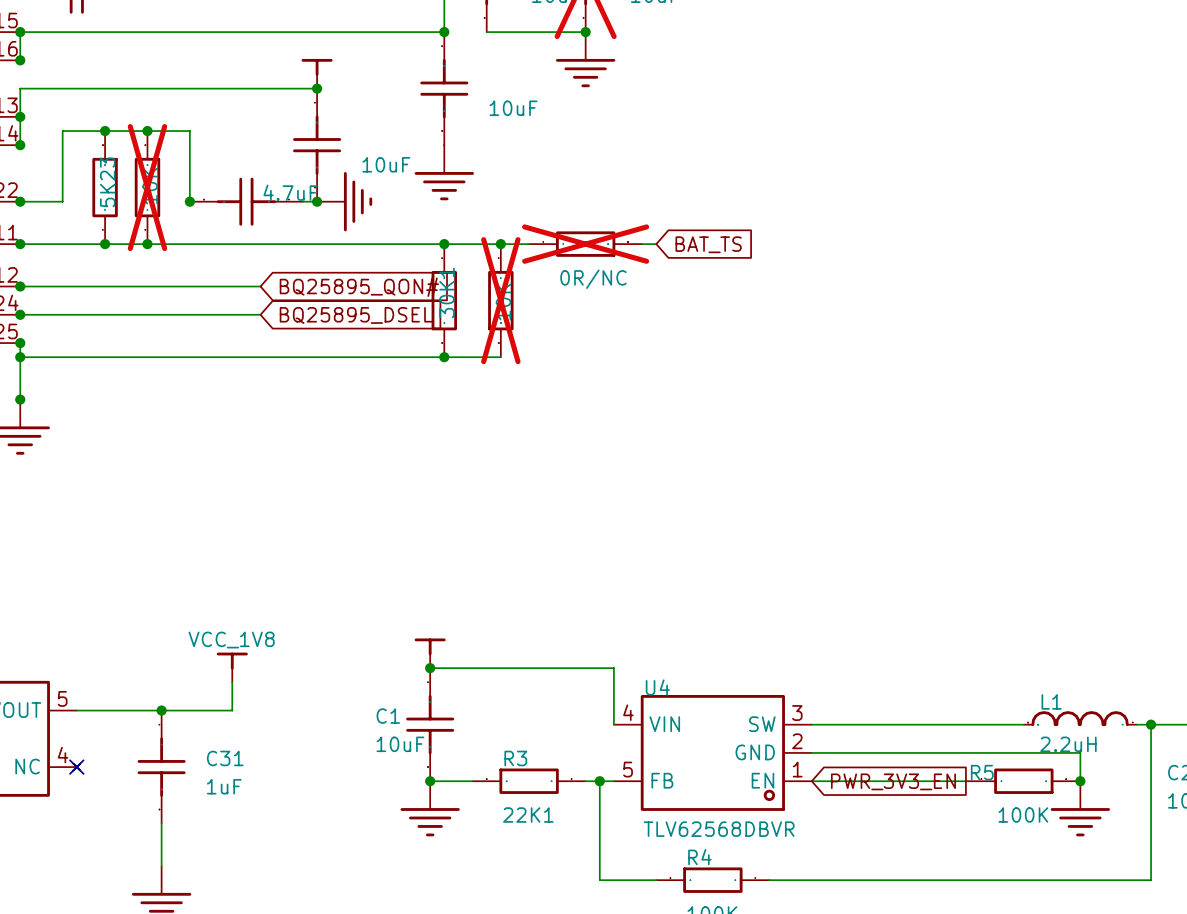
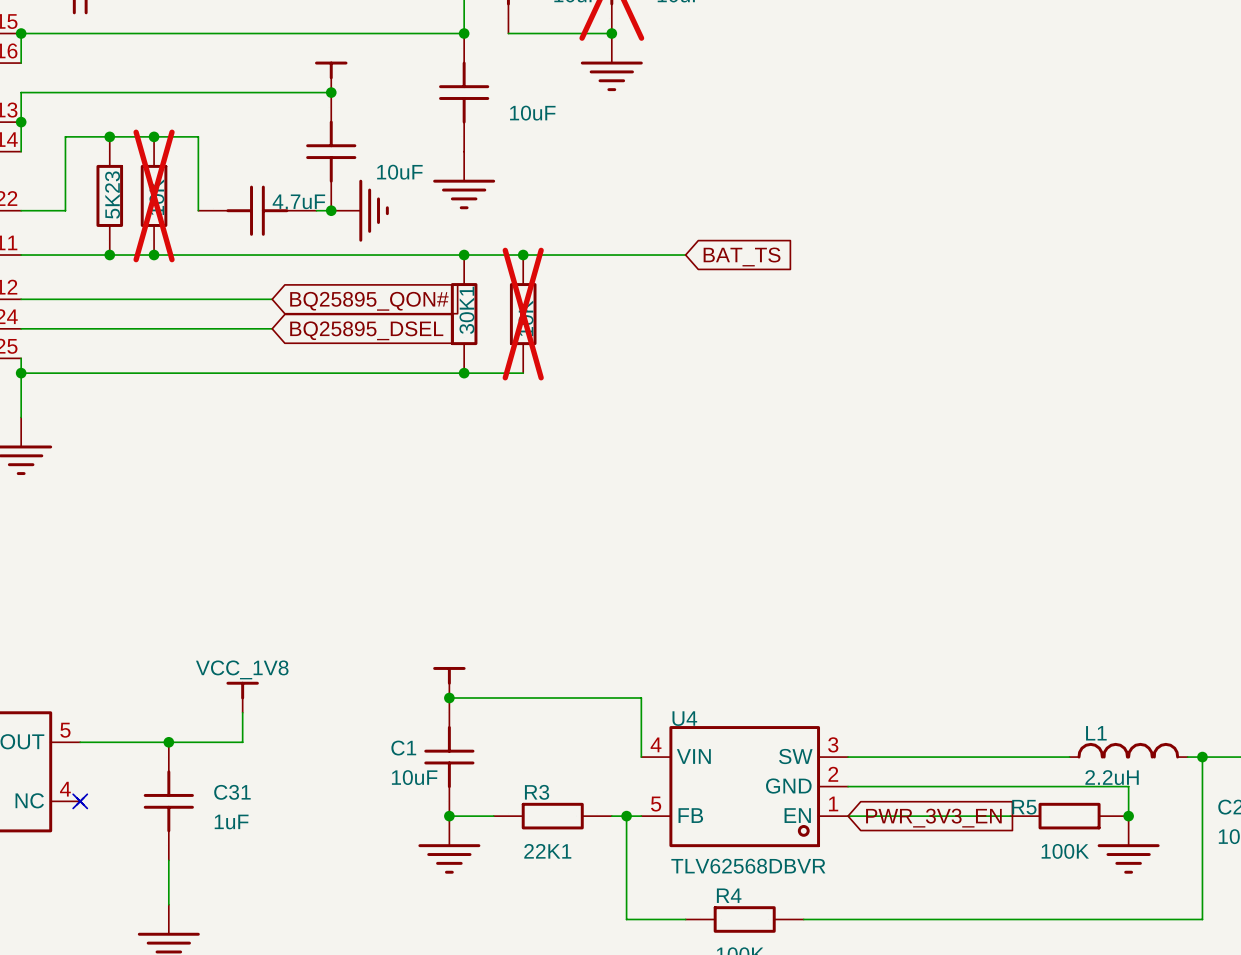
junction: (20, 60) -> none
junction: (20, 145) -> none
junction: (20, 201) -> none
junction: (189, 201) -> none
junction: (20, 244) -> none
part: 0R/NC (585, 244) -> none
junction: (20, 286) -> none
junction: (20, 314) -> none
junction: (20, 343) -> none
junction: (20, 399) -> none

